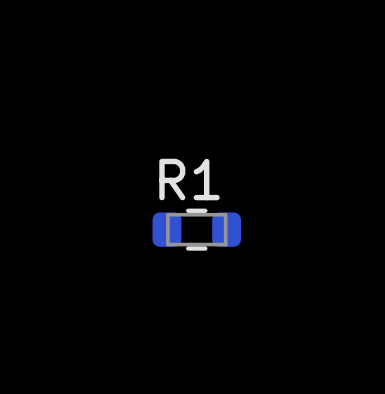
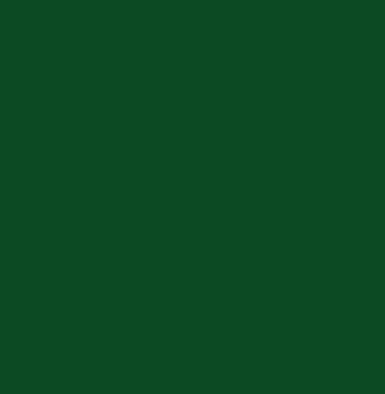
R1: (196, 229) -> none

